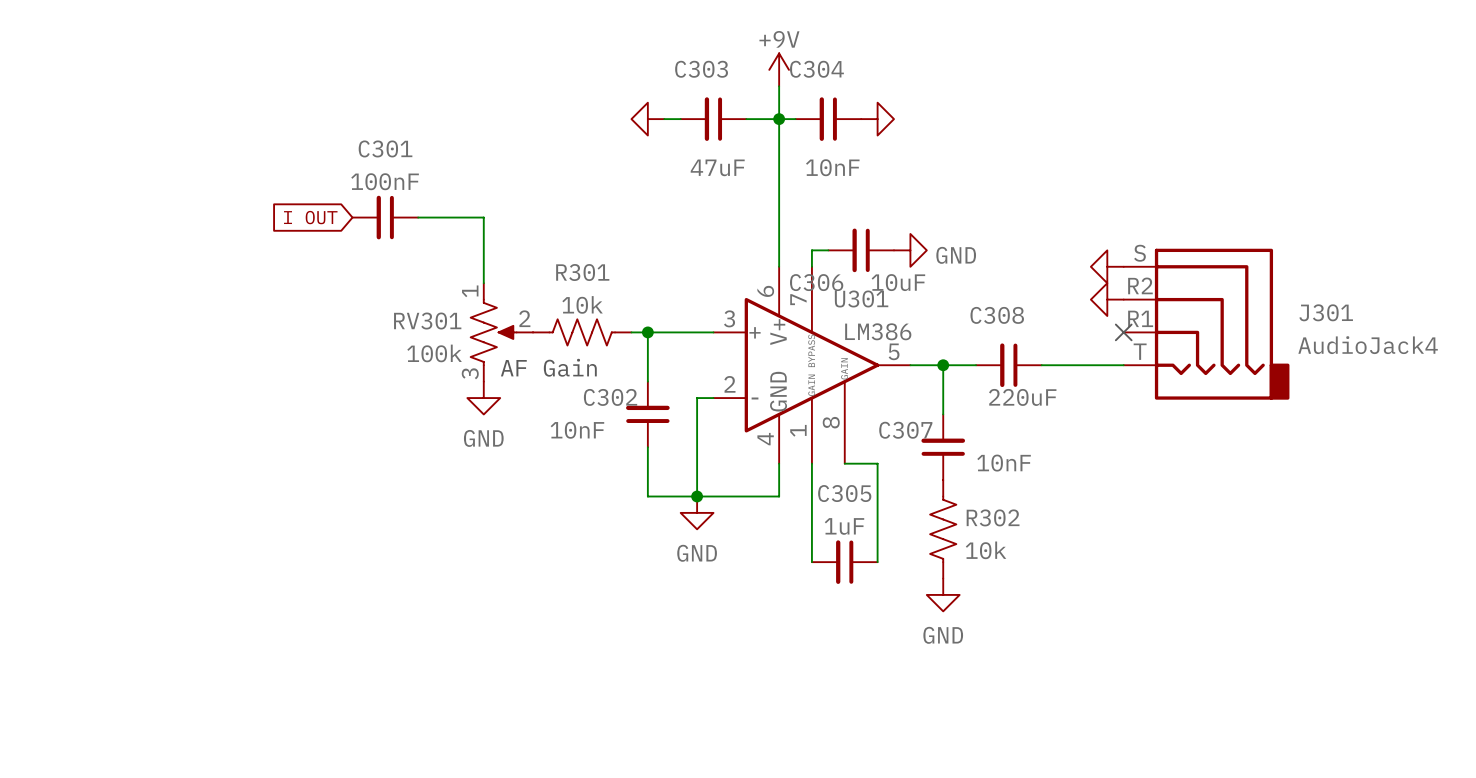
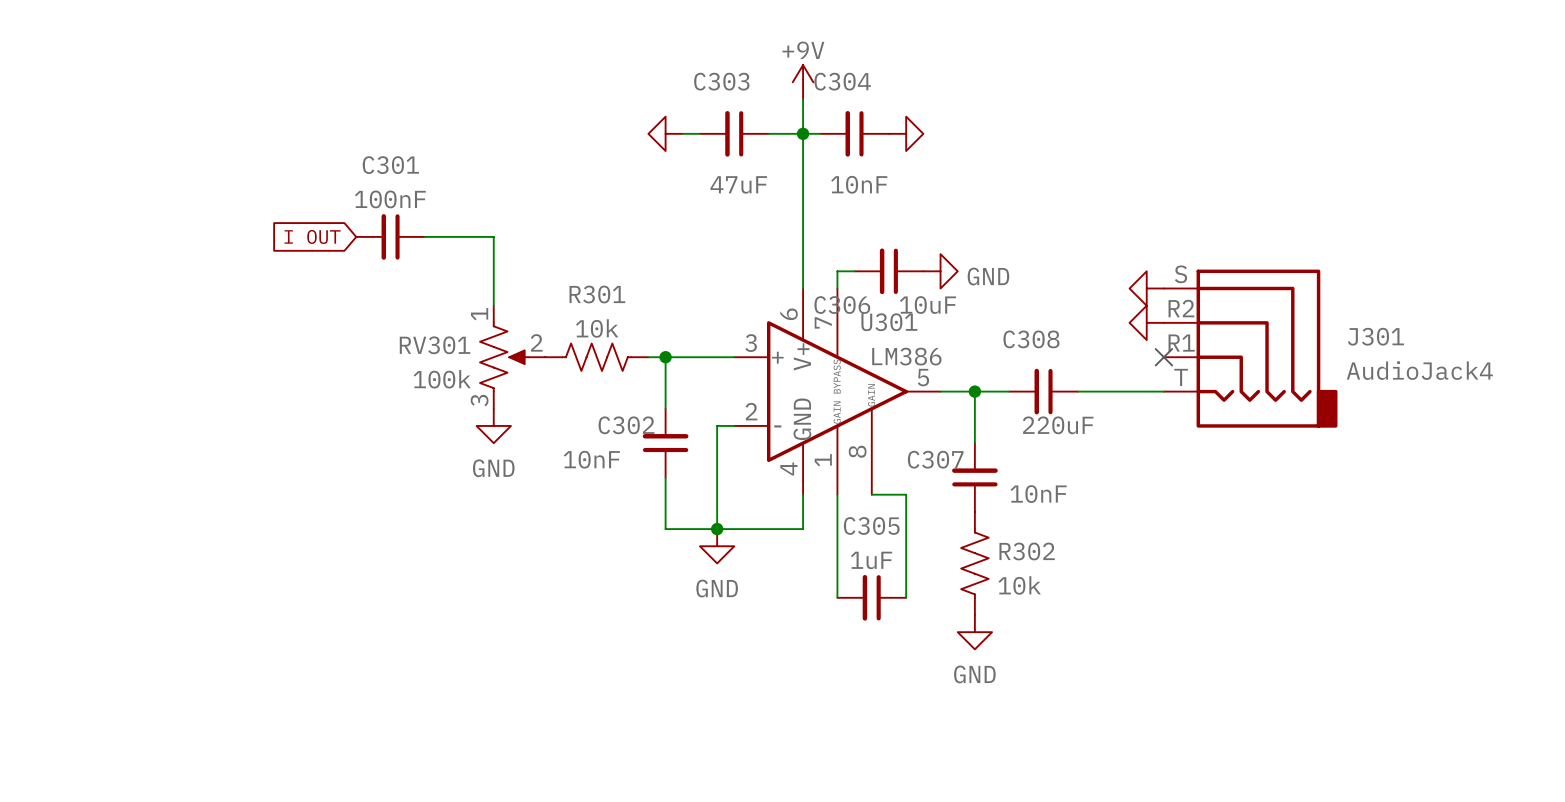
text: AF Gain (548, 367) -> none

